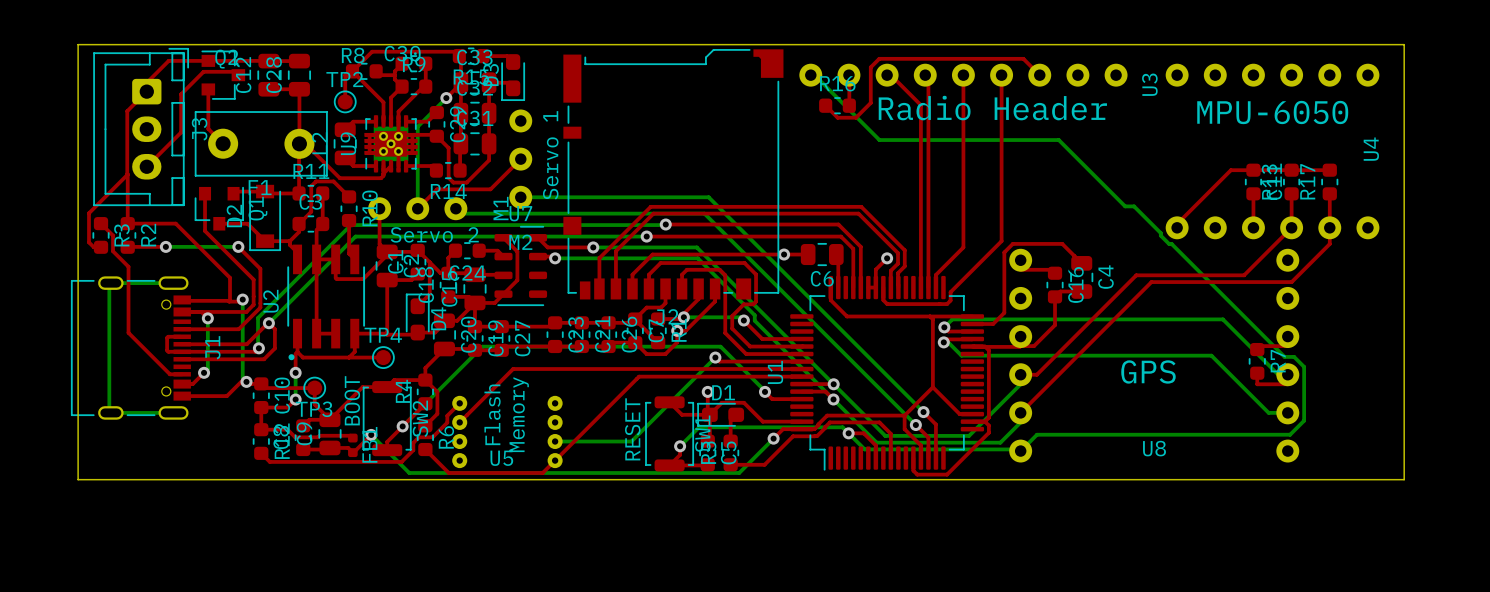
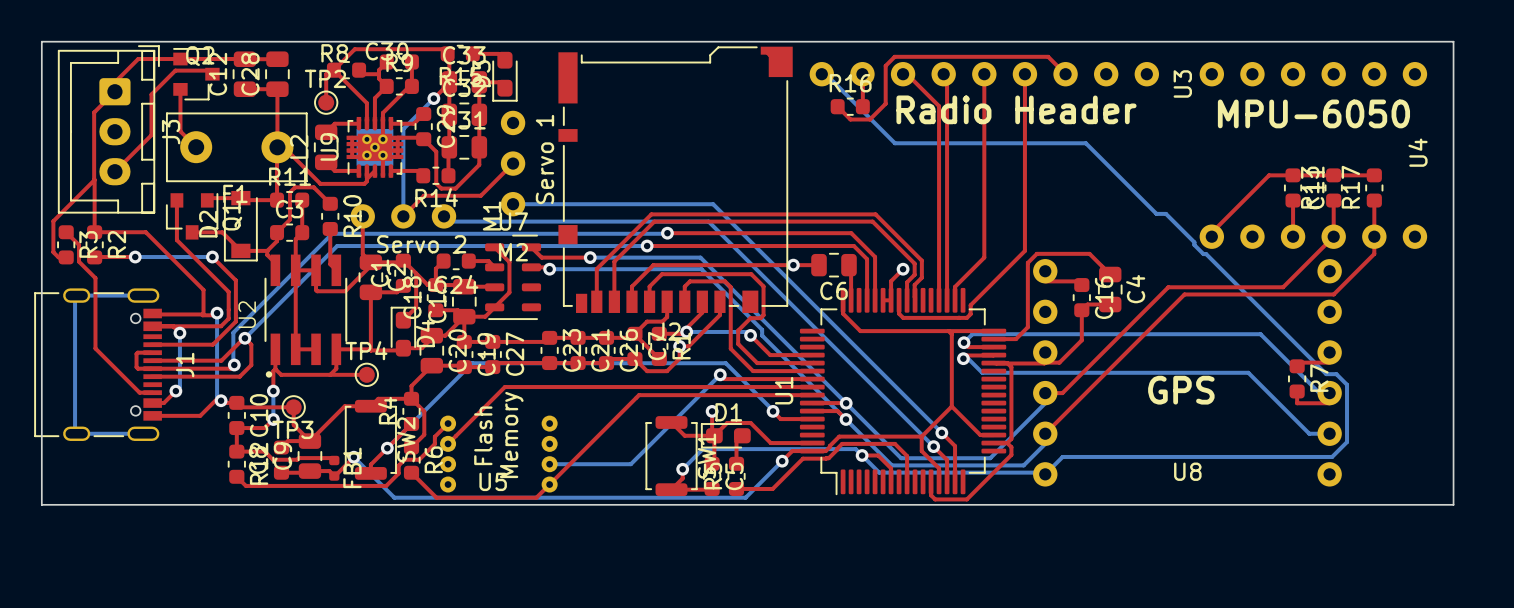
text: BOOT (352, 400) -> none
text: RESET (632, 429) -> none

